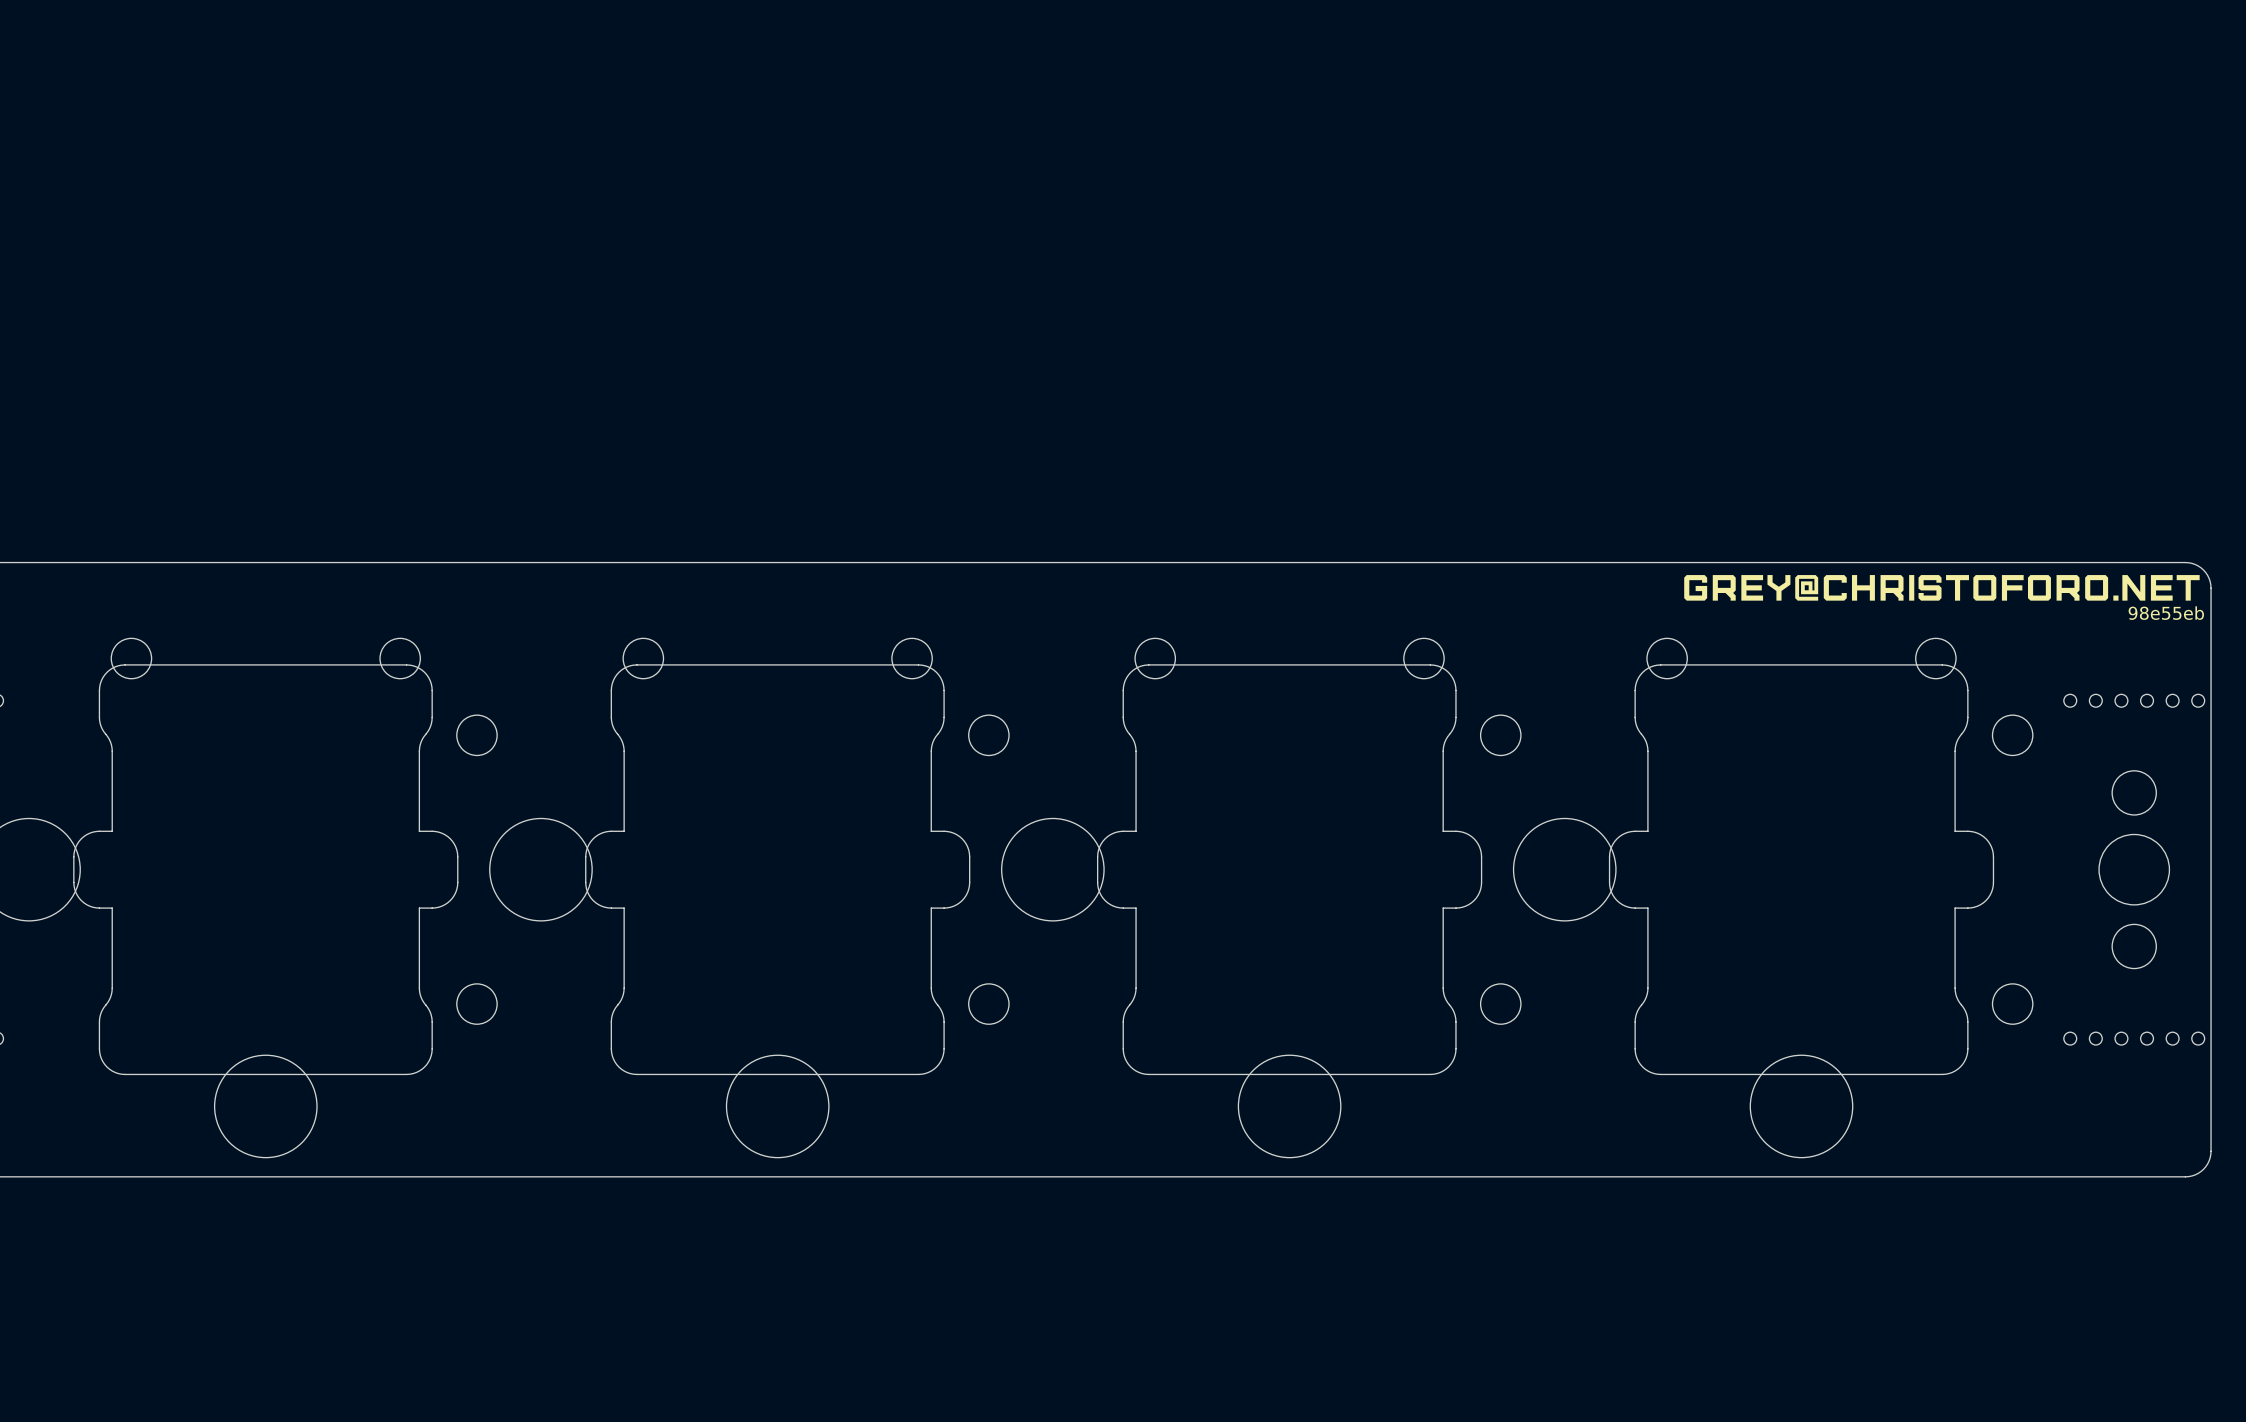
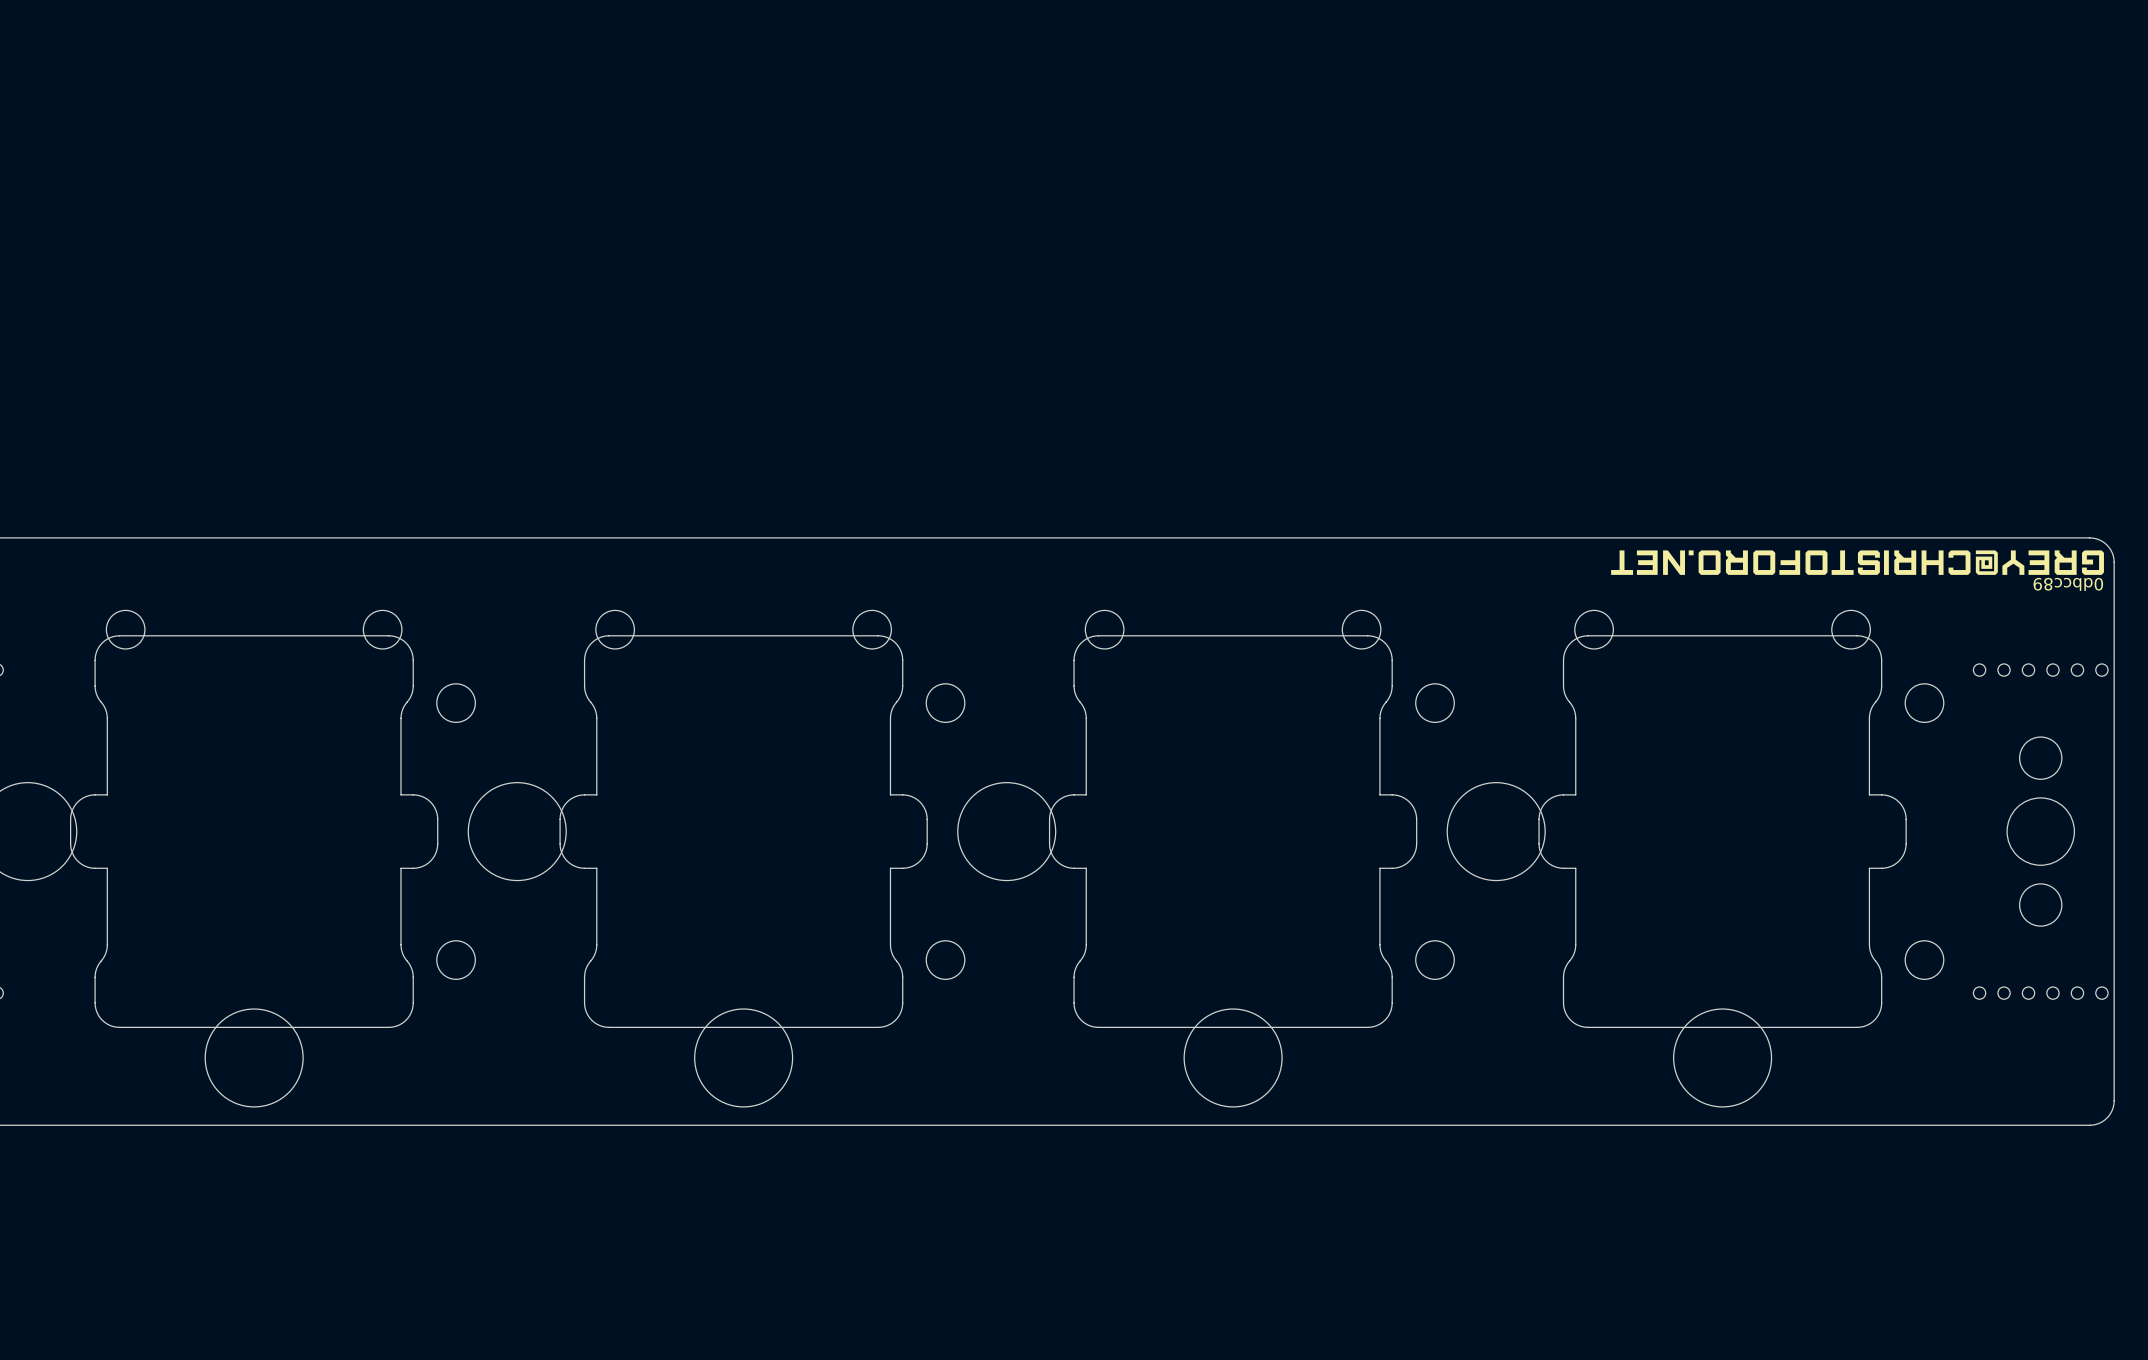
drawing shape: [1684, 575, 2200, 601] -> [1611, 550, 2104, 575]
text: 98e55eb (2166, 613) -> 0dbcc89 (2068, 584)

